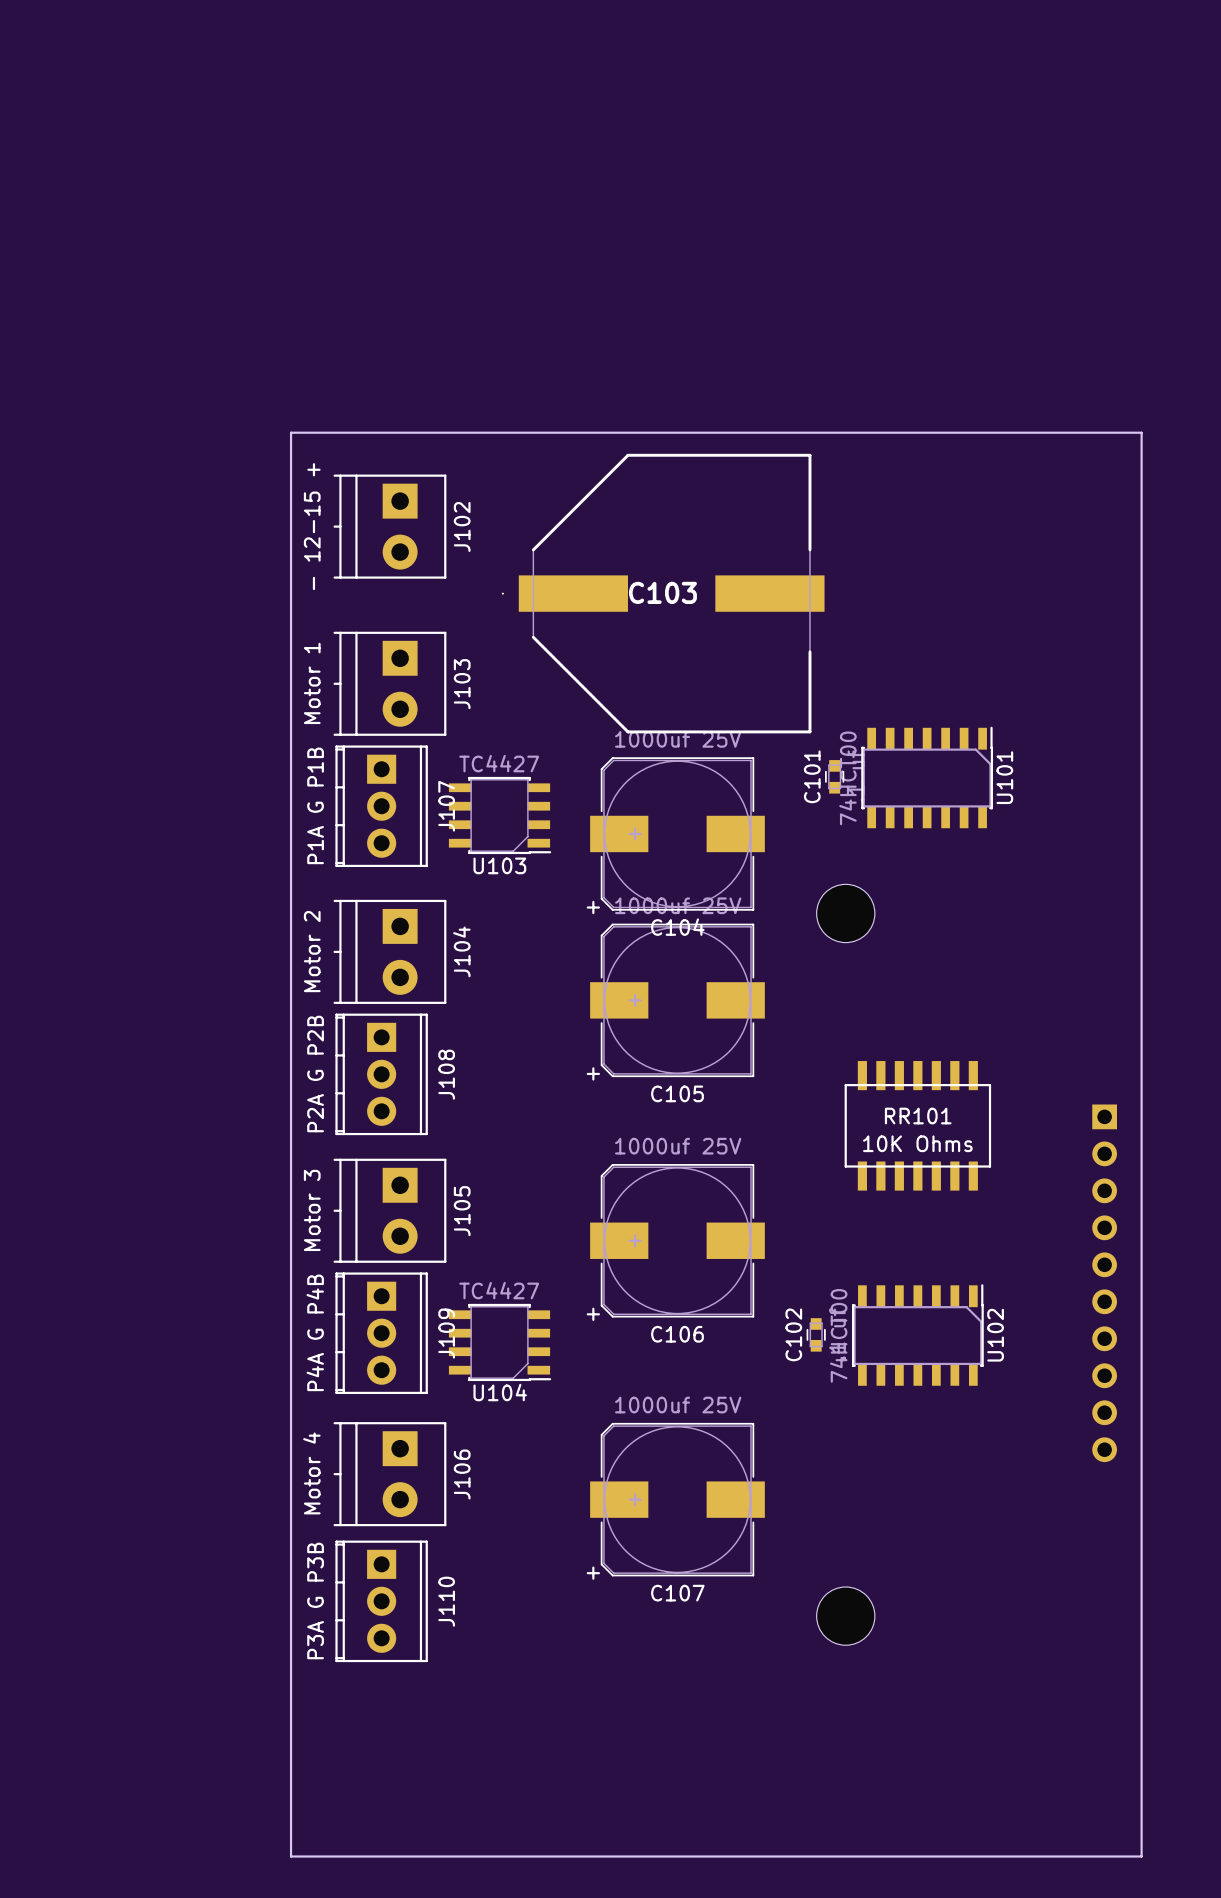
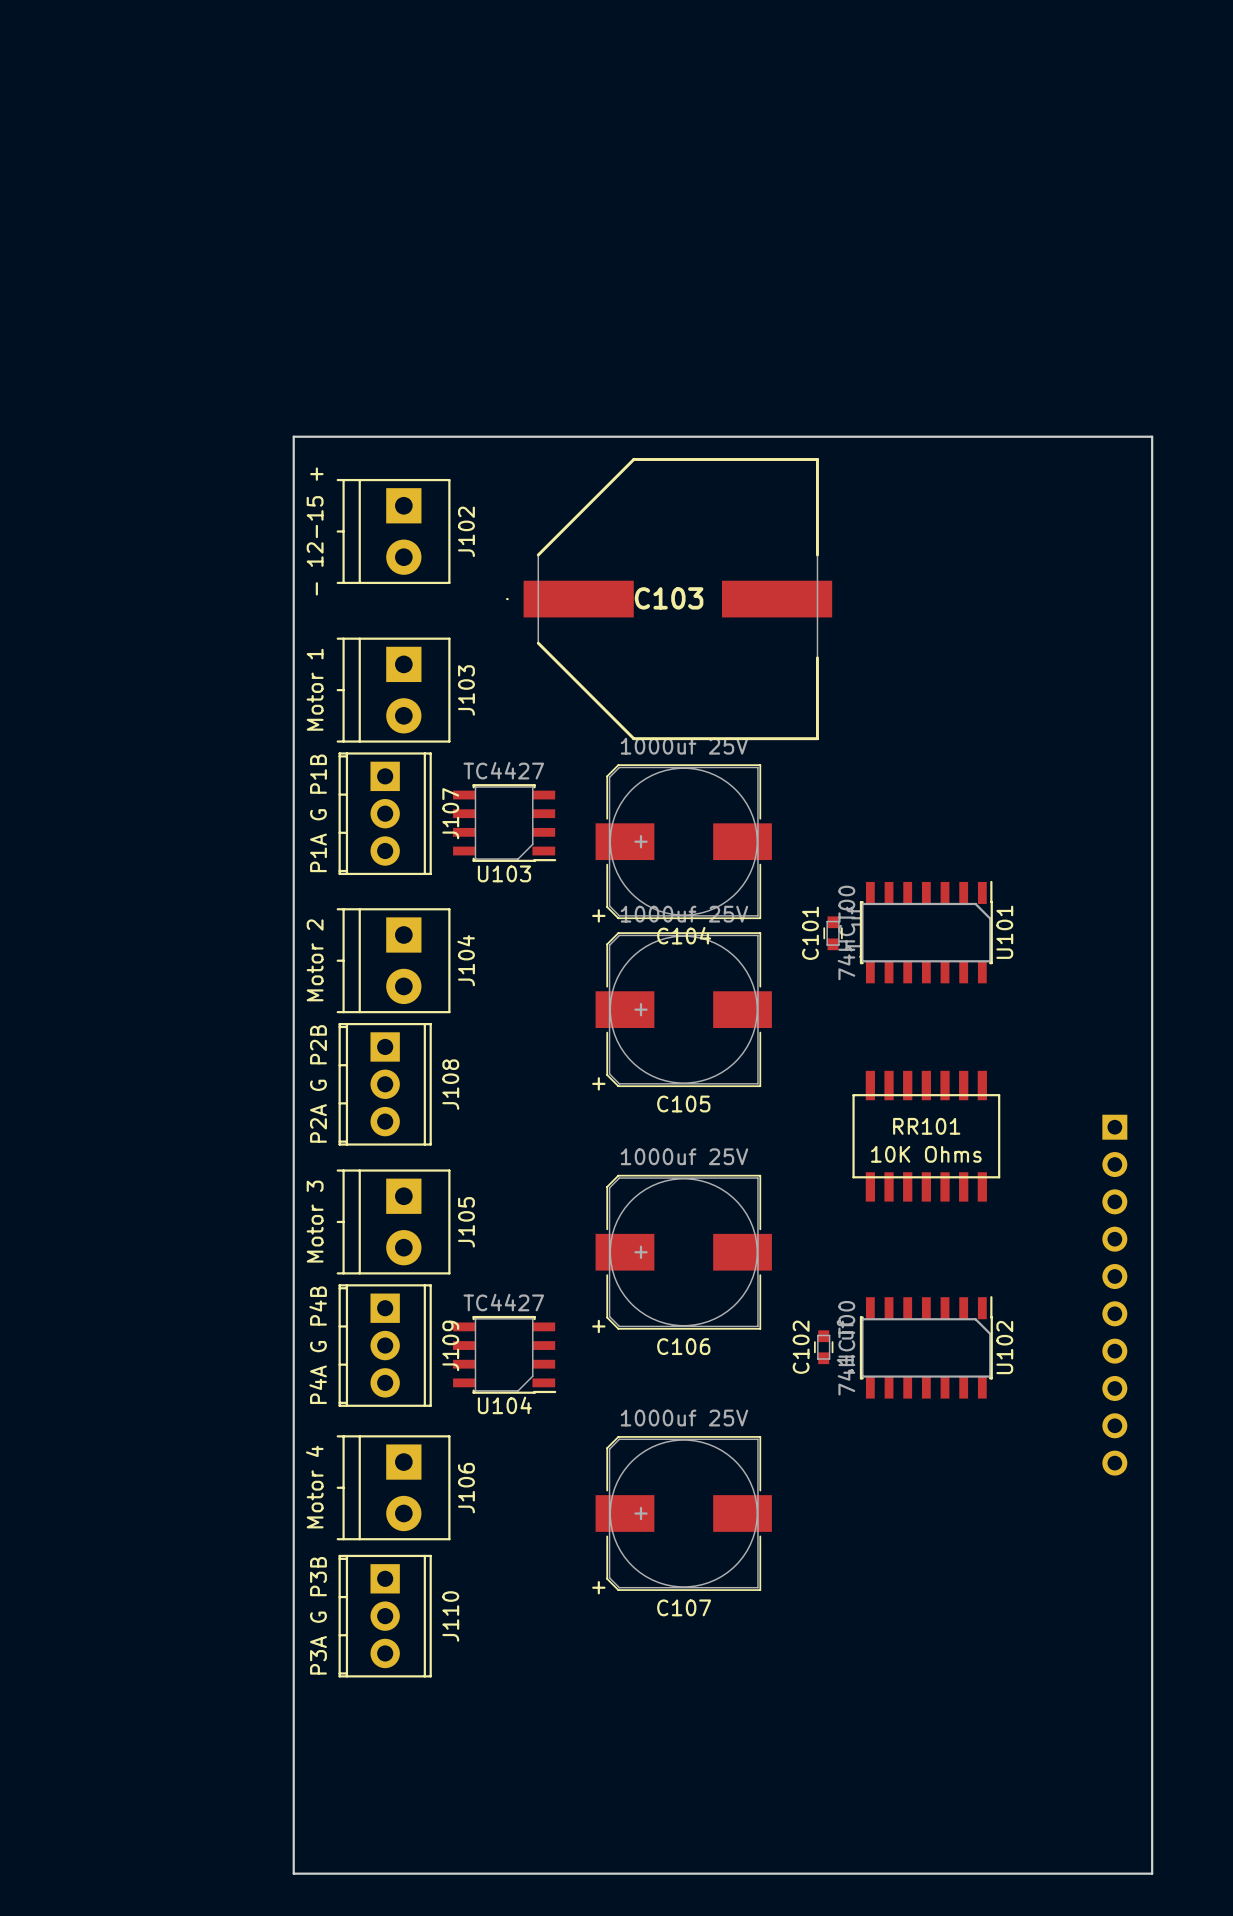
C101 position: (834, 776) -> (833, 933)
U101 position: (927, 777) -> (926, 932)
part: (845, 913) -> none
part: (845, 1616) -> none

